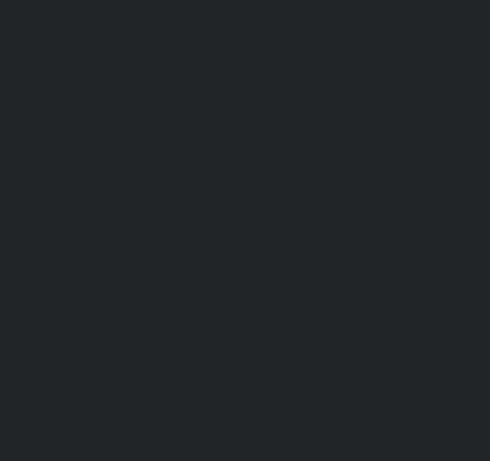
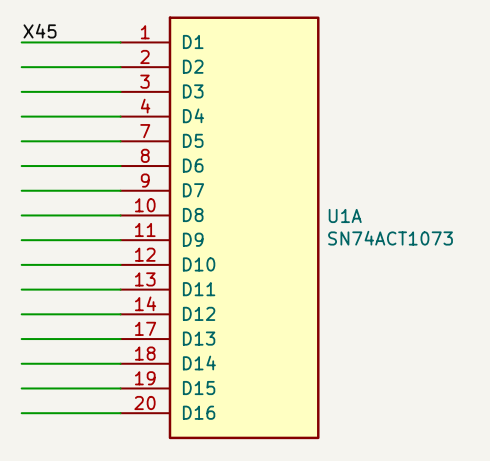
label: none -> X45 (40, 31)
wire: none -> (21, 42) (120, 42)
wire: none -> (21, 67) (120, 67)
wire: none -> (21, 91) (120, 91)
wire: none -> (21, 116) (120, 116)
wire: none -> (21, 141) (120, 141)
wire: none -> (21, 166) (120, 166)
wire: none -> (21, 190) (120, 190)
wire: none -> (21, 215) (120, 215)
U1A: none -> SN74ACT1073 (220, 227)
wire: none -> (21, 240) (120, 240)
wire: none -> (21, 264) (120, 264)
wire: none -> (21, 289) (120, 289)
wire: none -> (21, 314) (120, 314)
wire: none -> (21, 339) (120, 339)
wire: none -> (21, 363) (120, 363)
wire: none -> (21, 388) (120, 388)
wire: none -> (21, 413) (120, 413)

